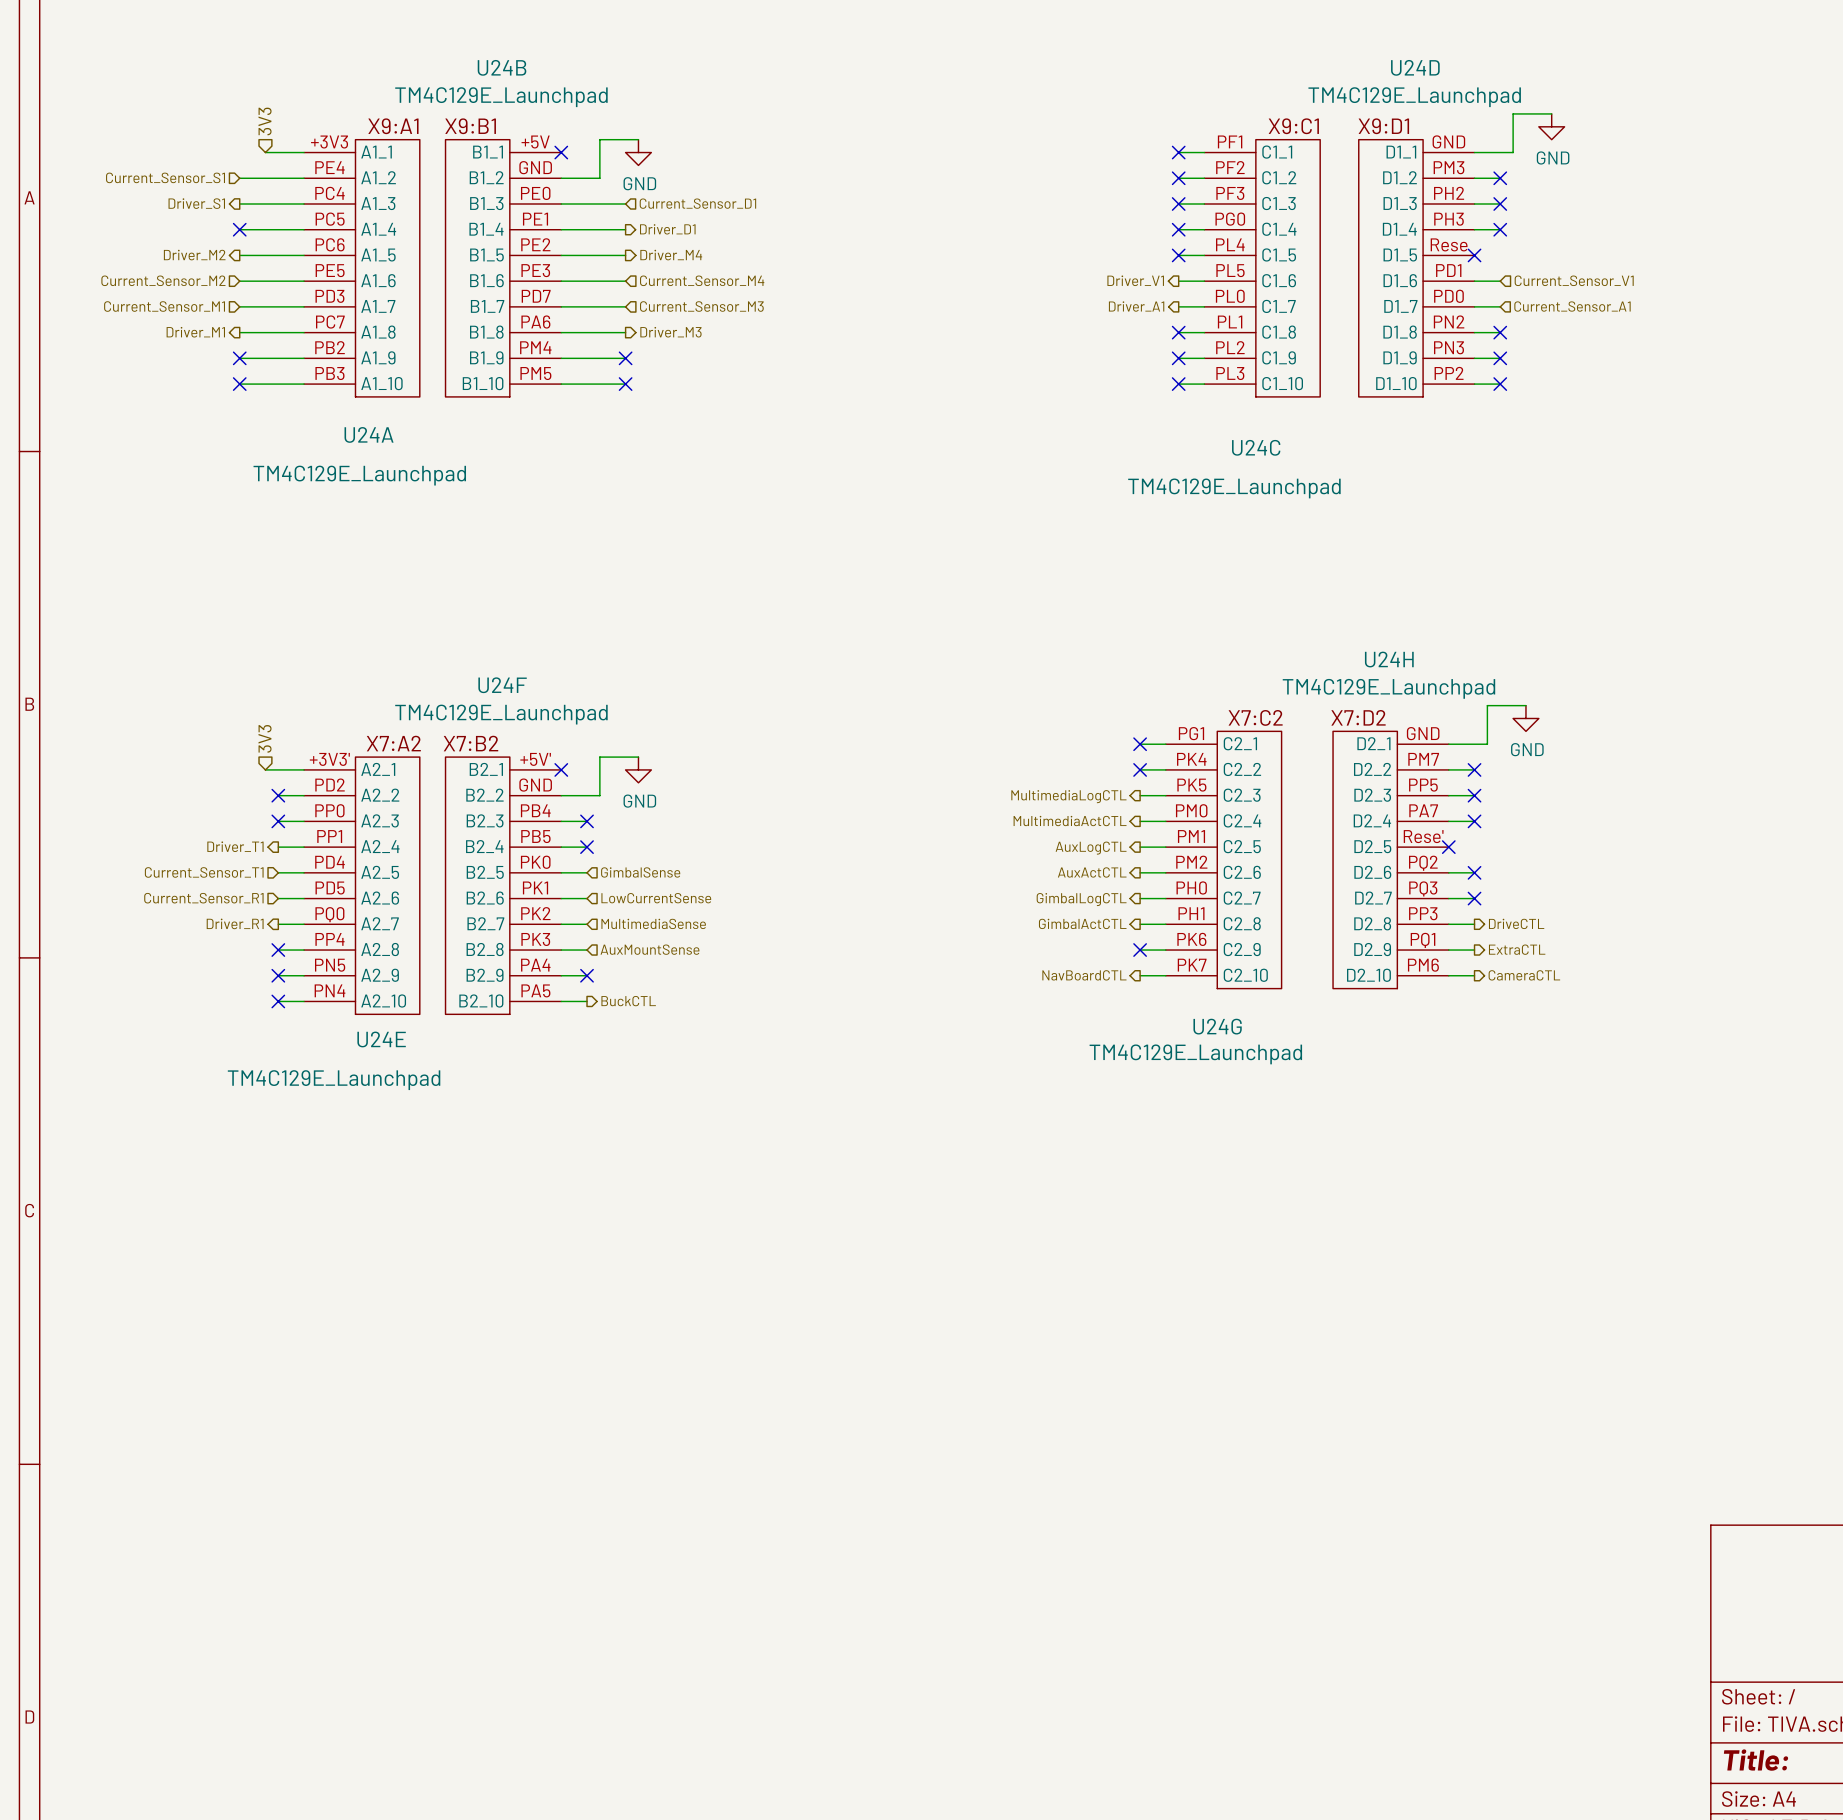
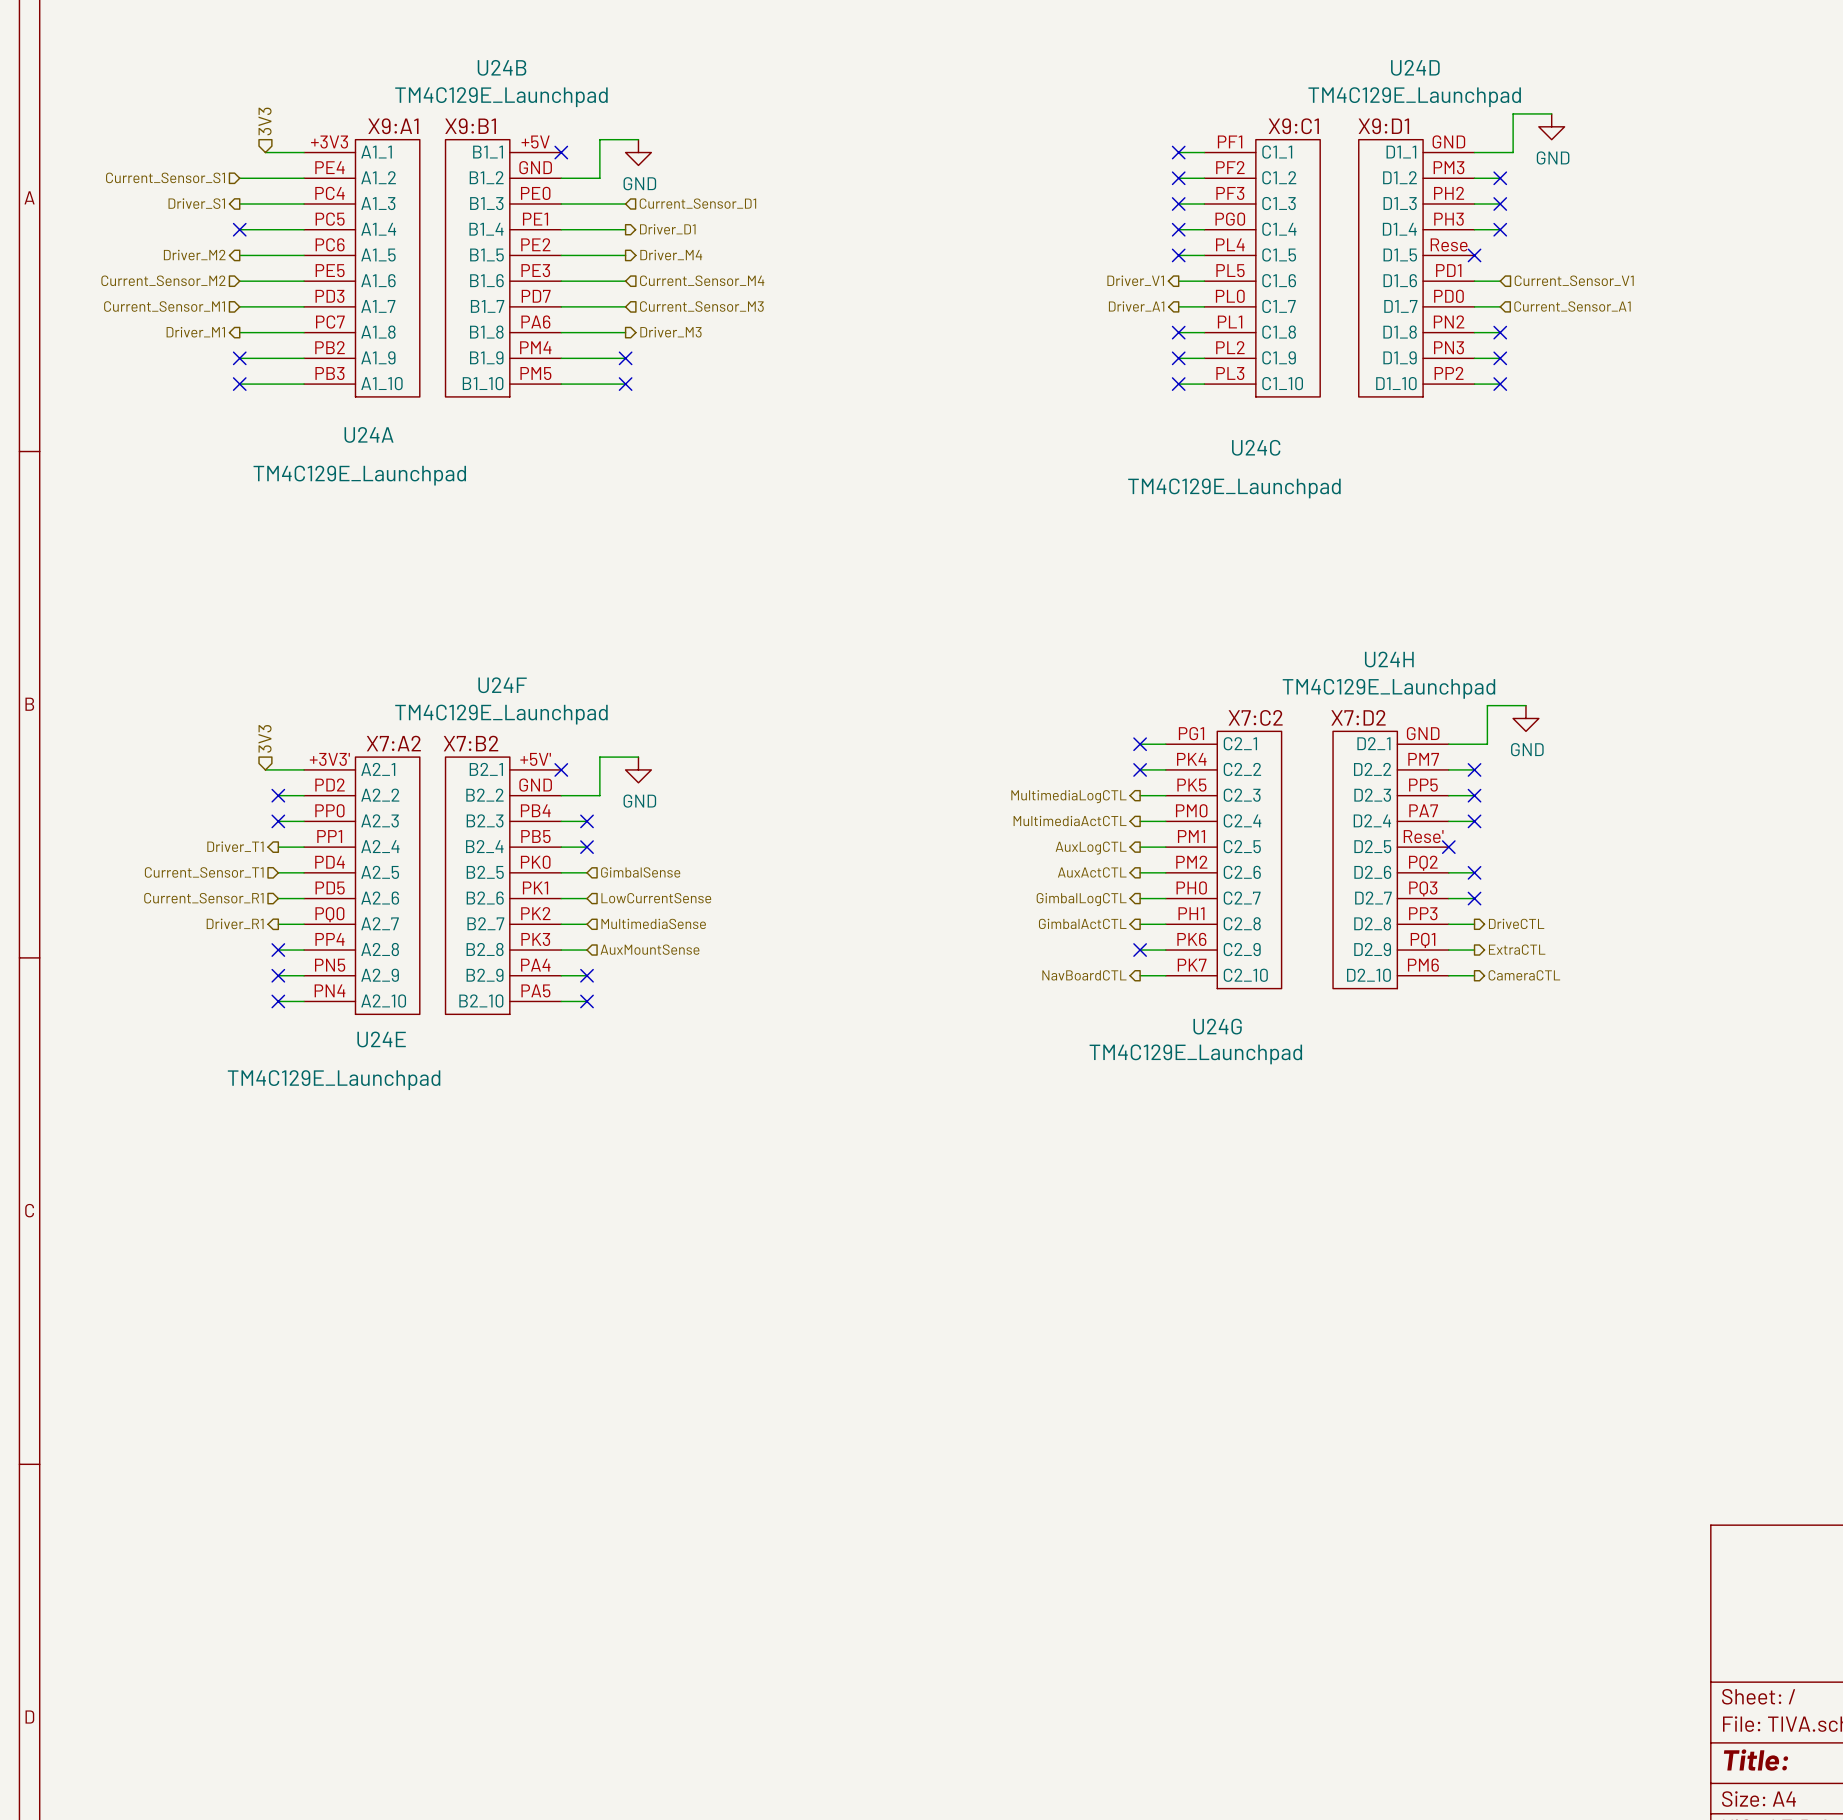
no-connect mark: none -> (587, 1001)
hierarchical label: BuckCTL (628, 1001) -> none

